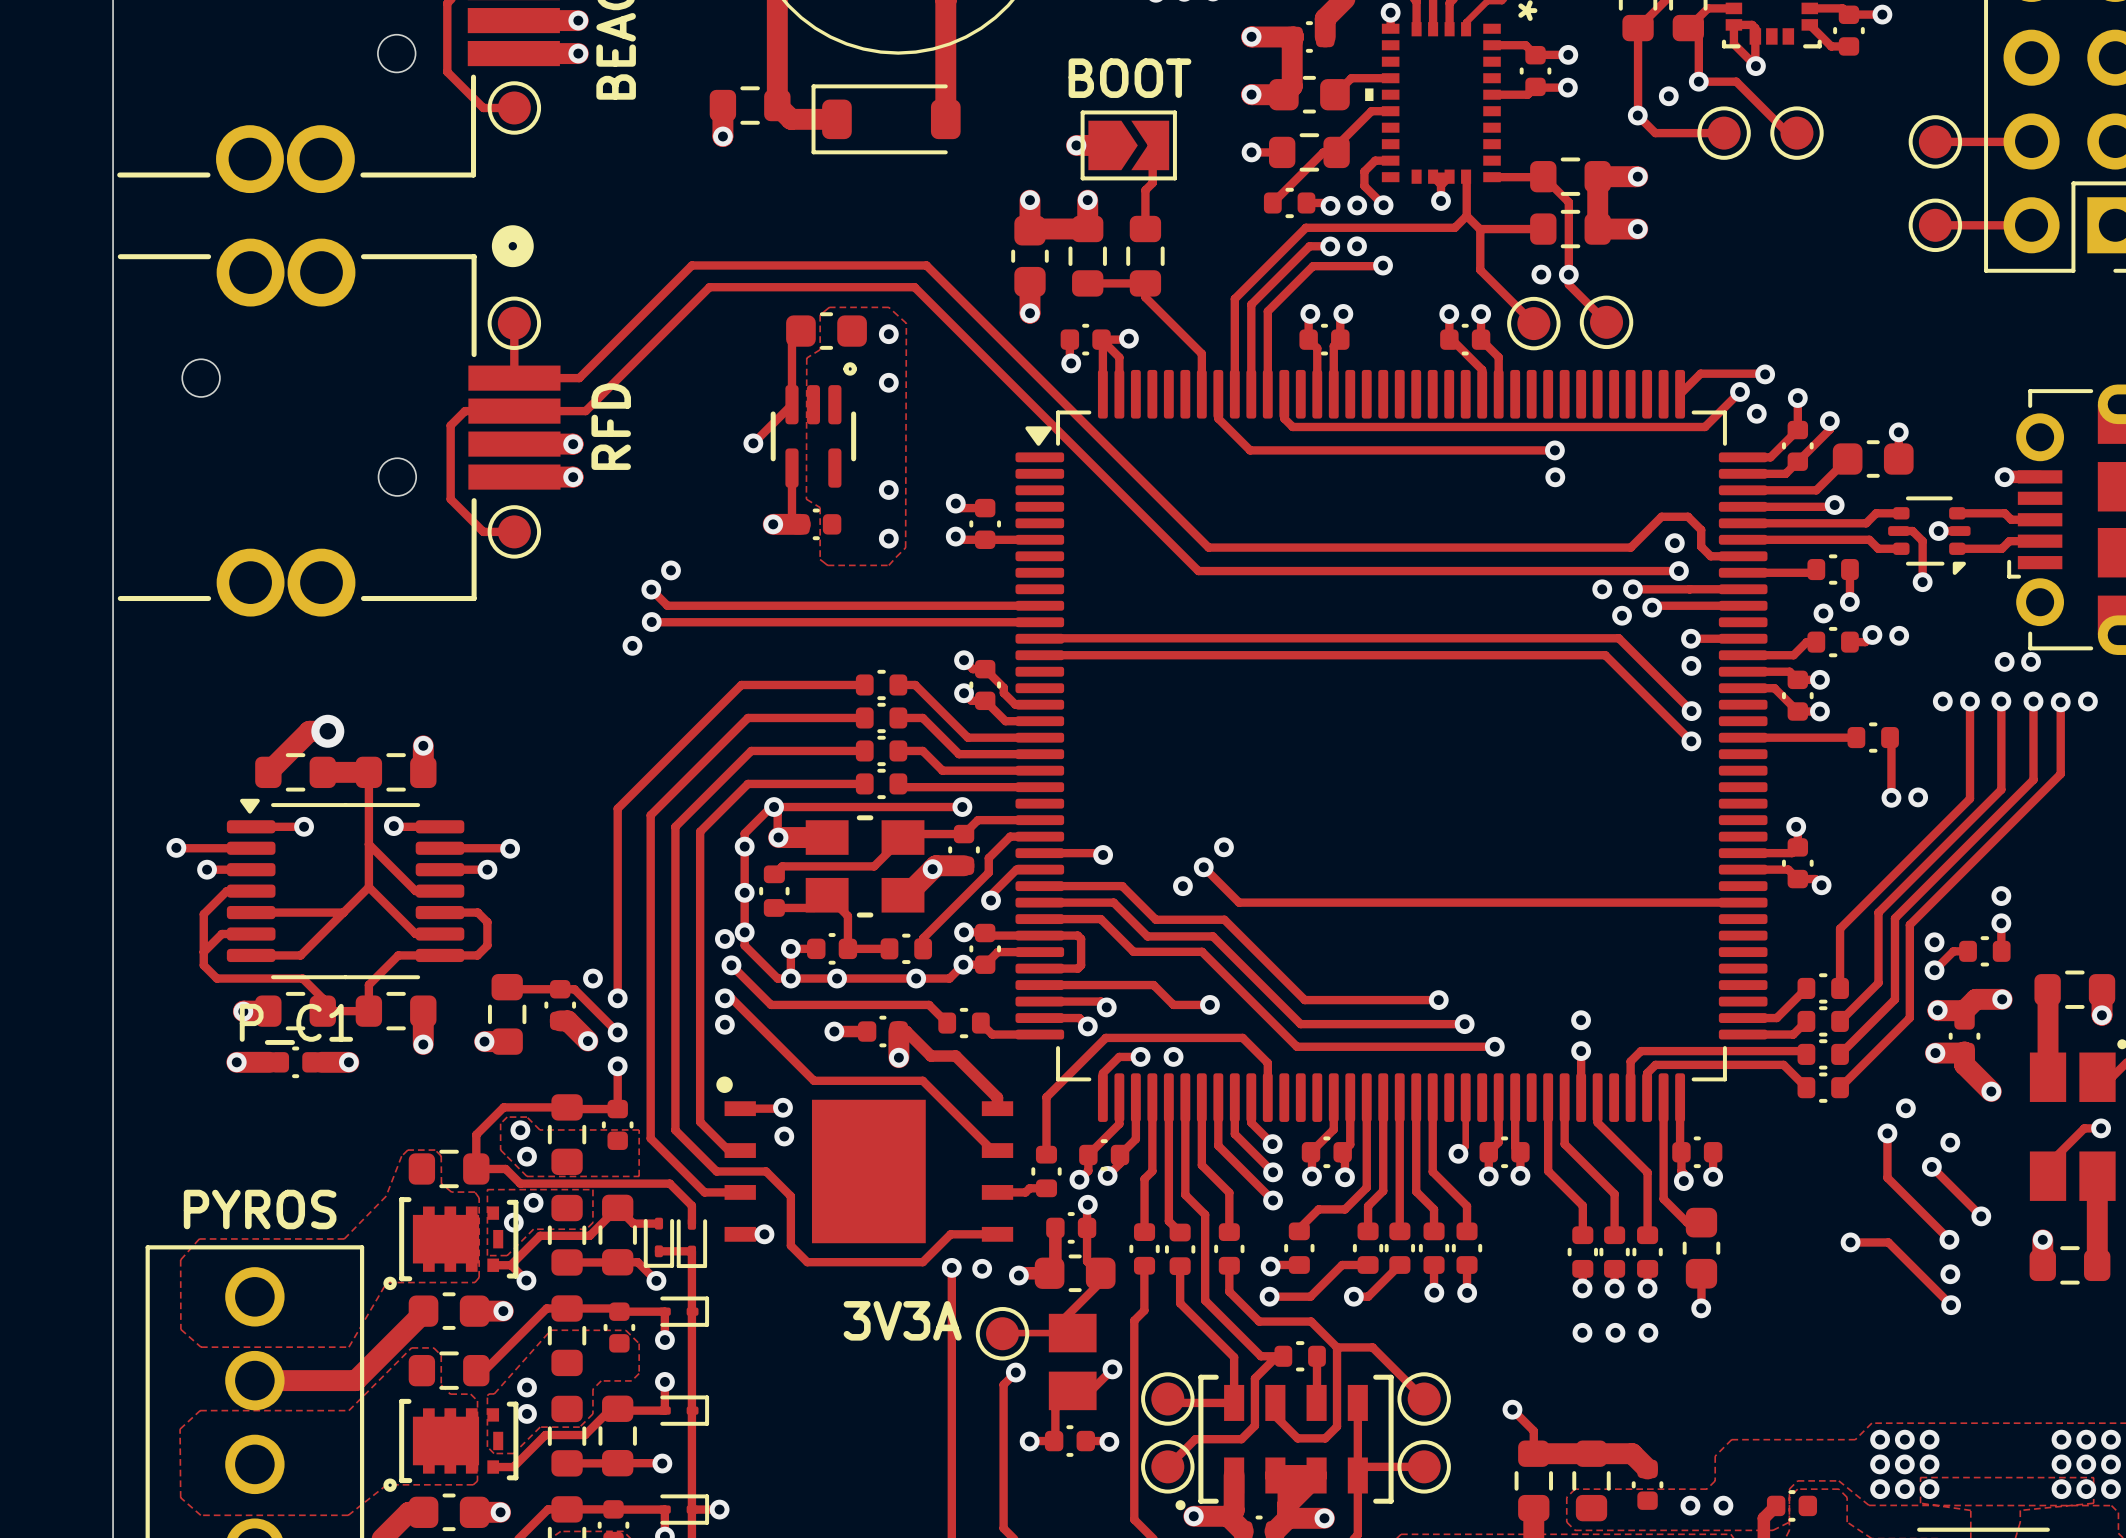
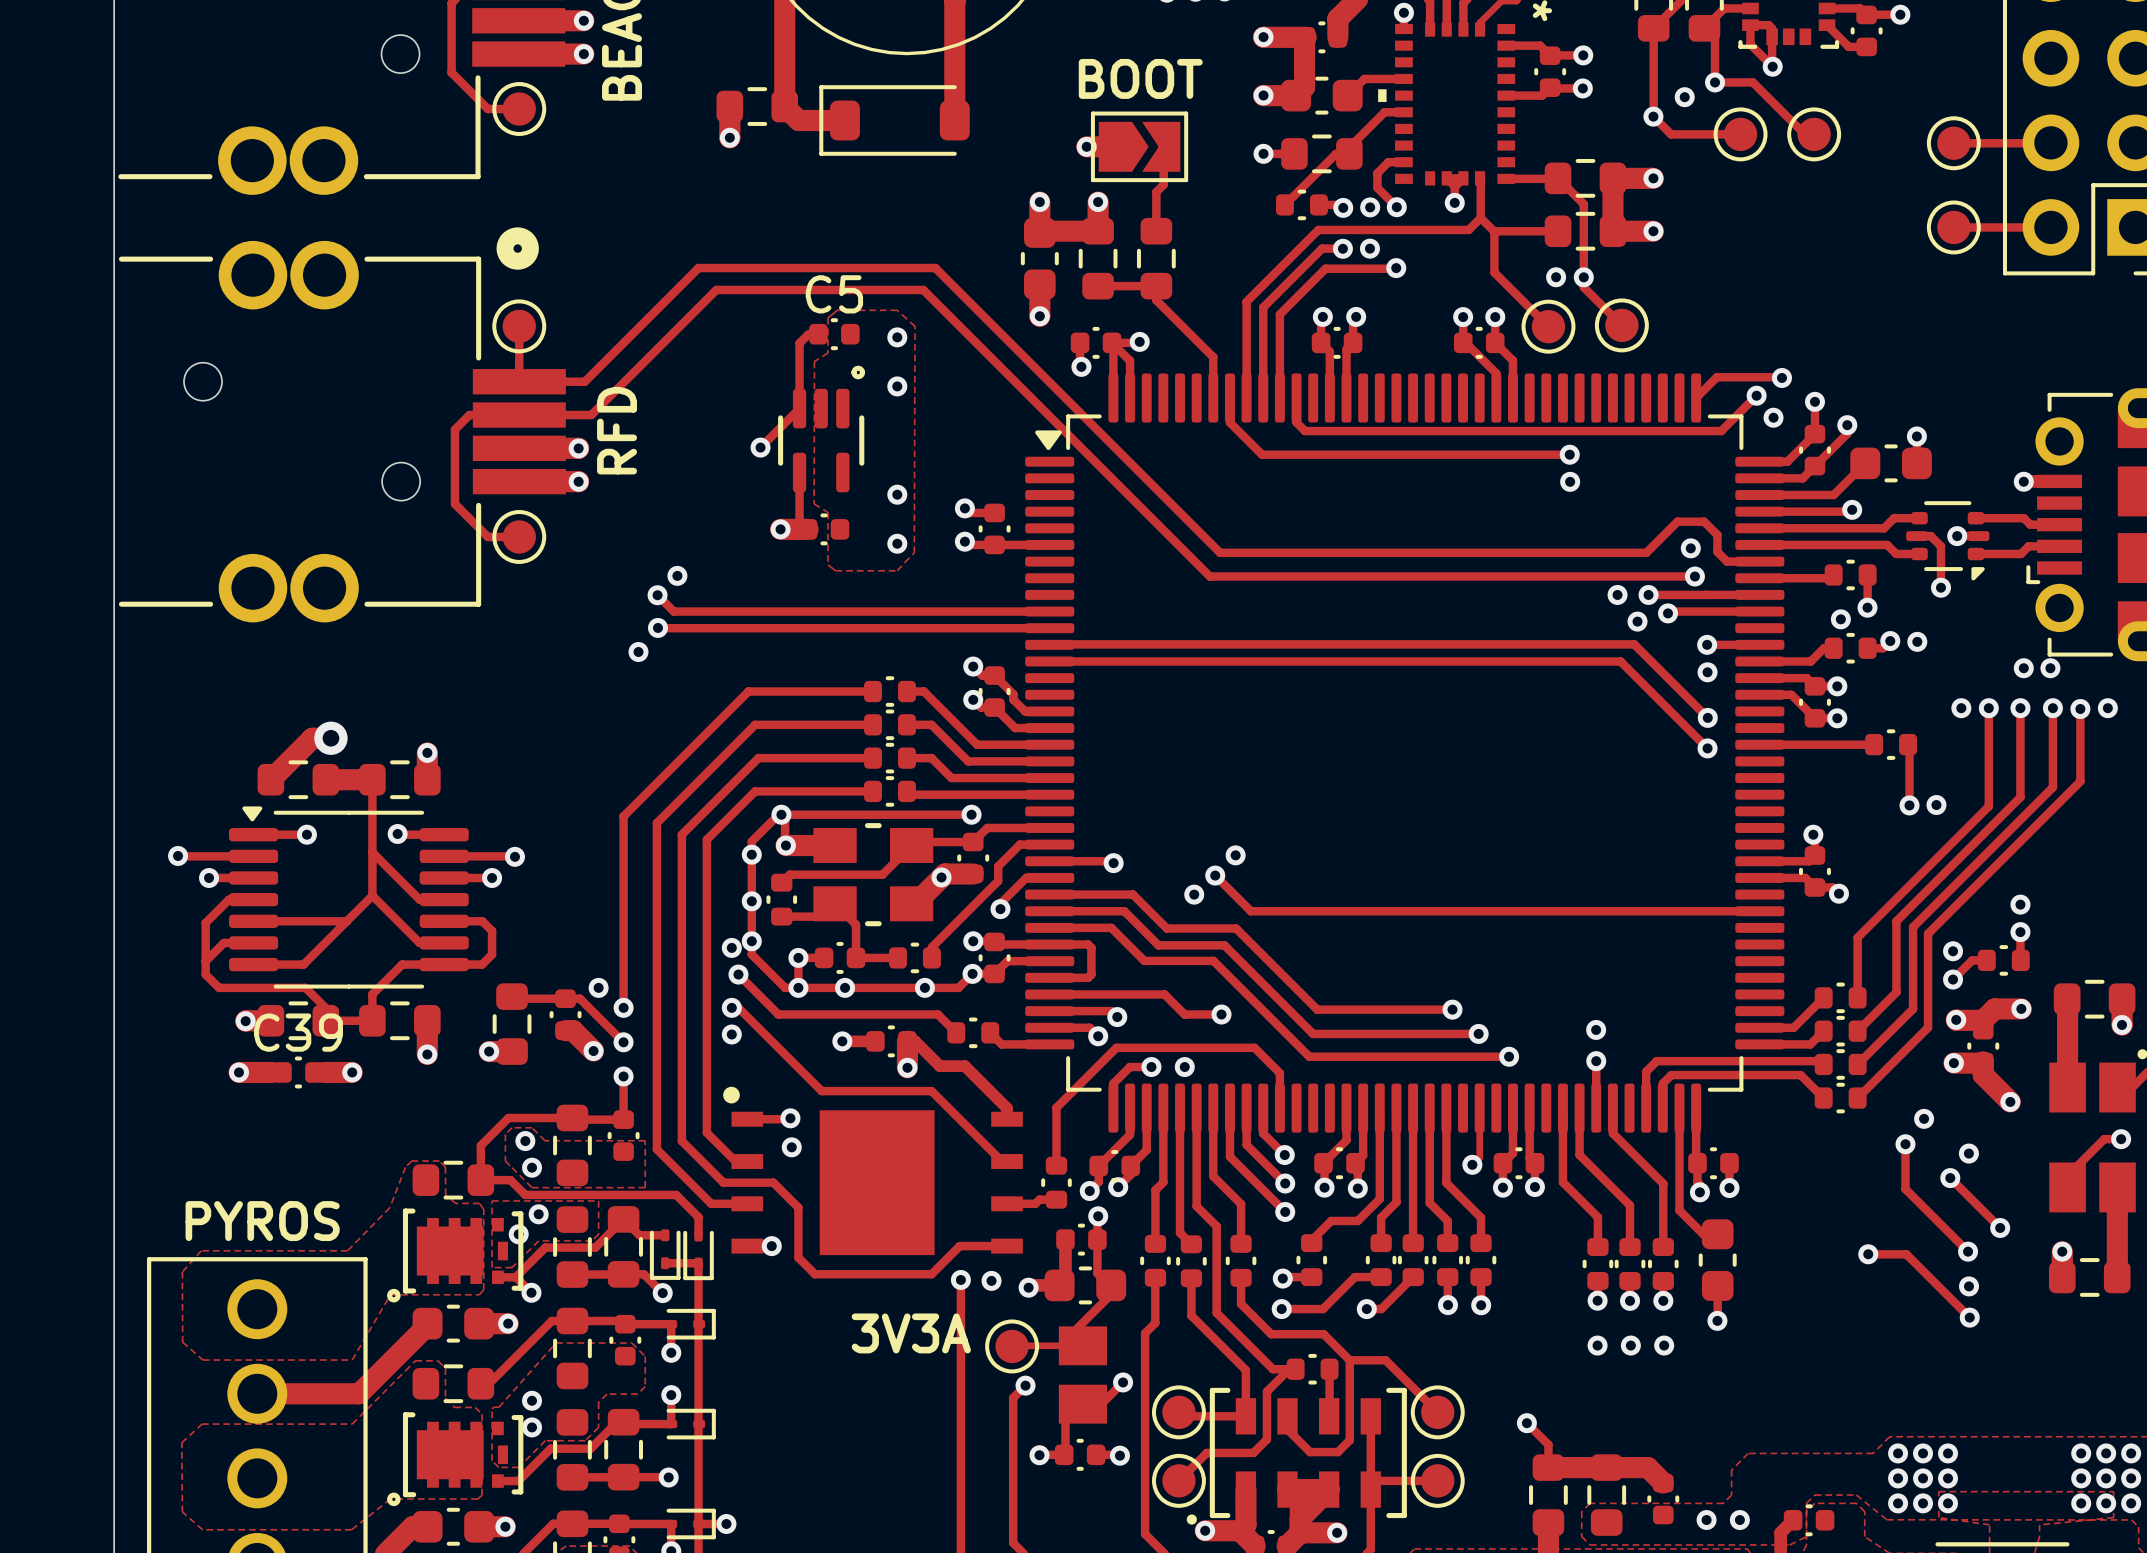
part: (826, 331) -> none
C5: none -> (834, 334)
P_C1 name: P_C1 (296, 1024) -> C39 (298, 1032)

